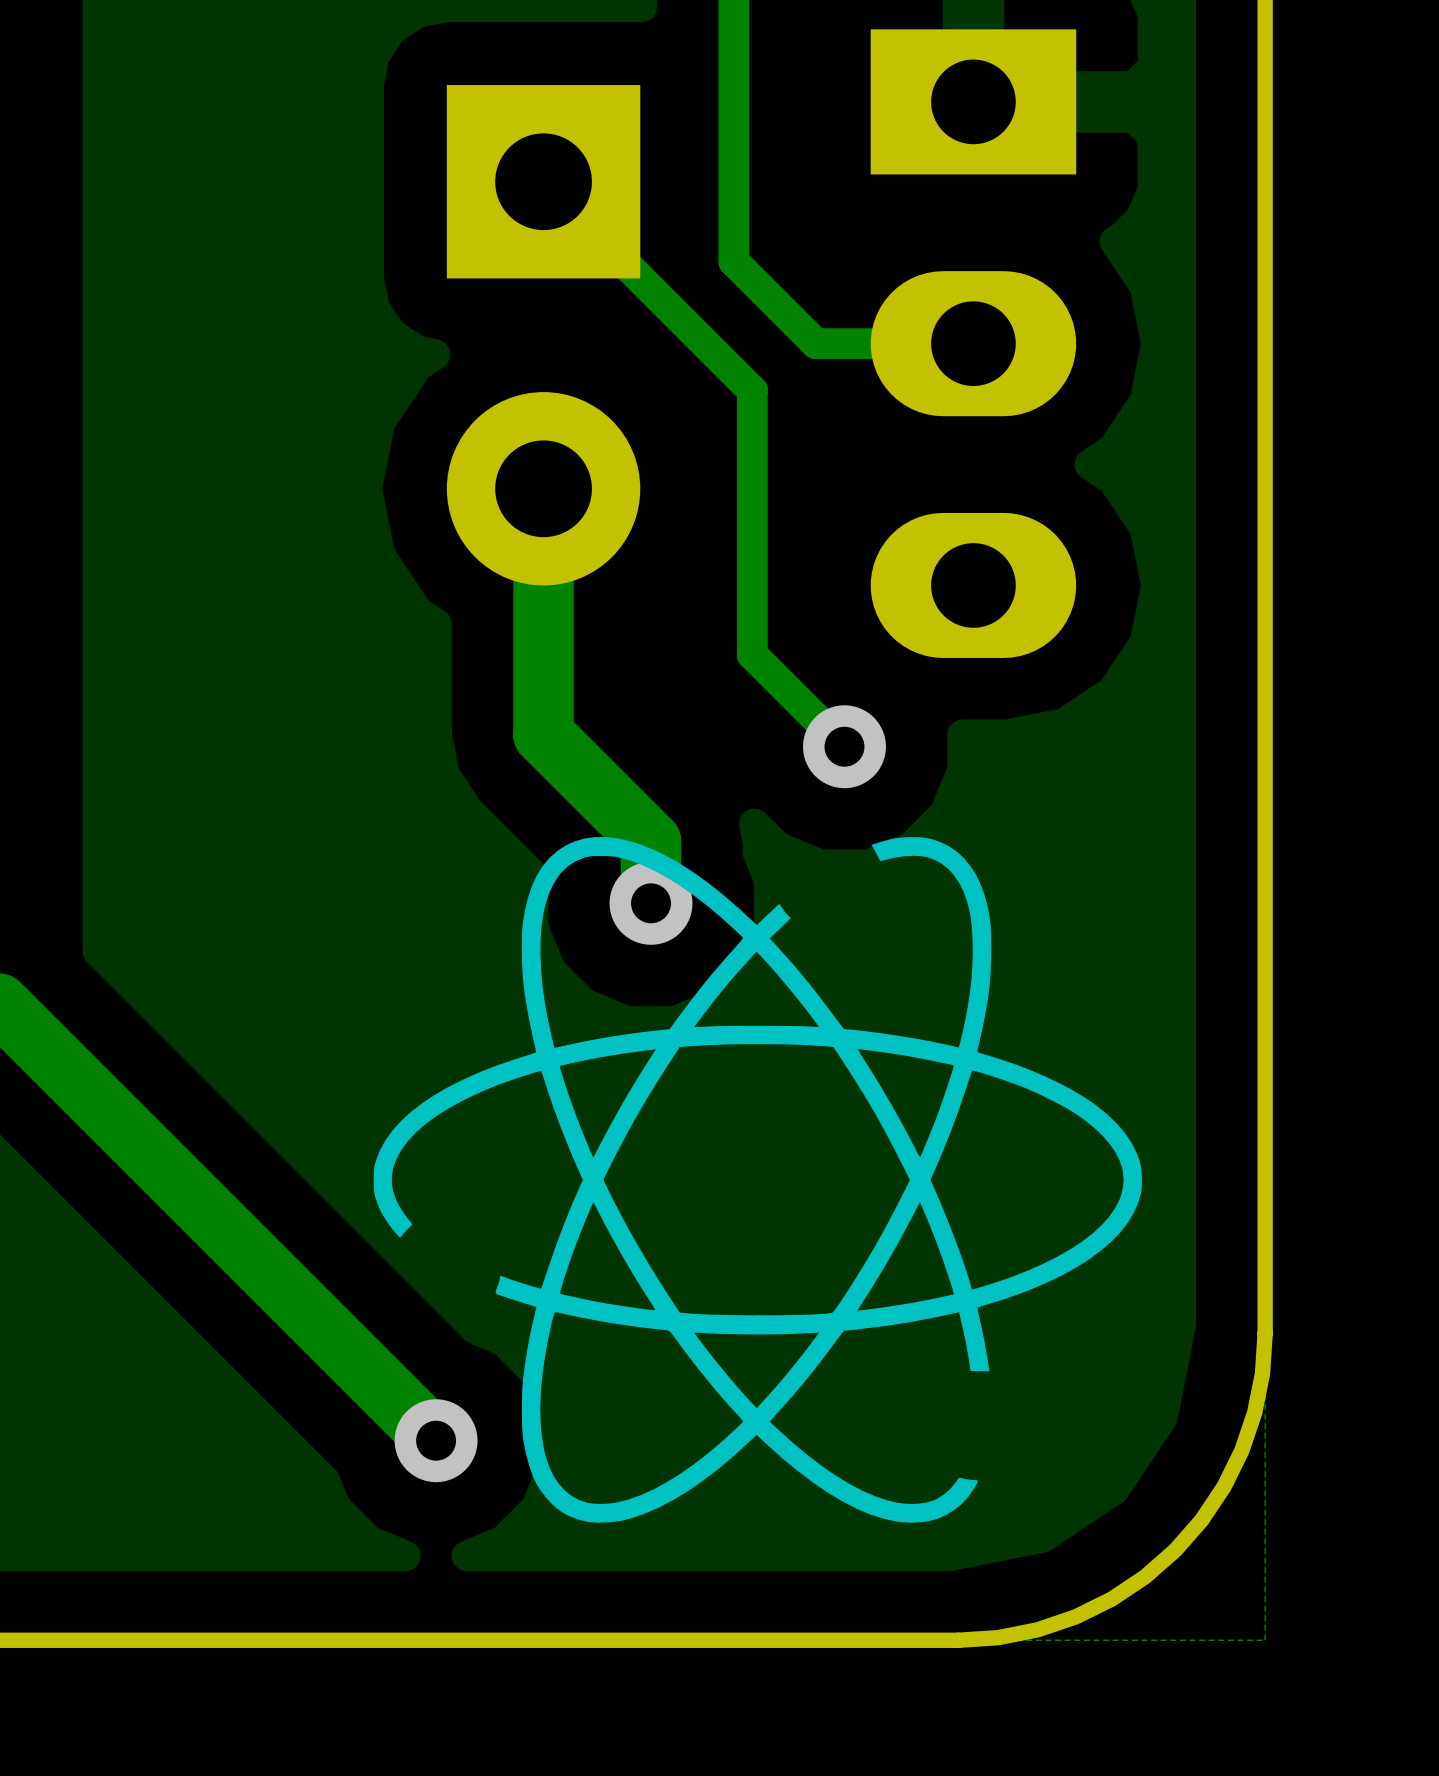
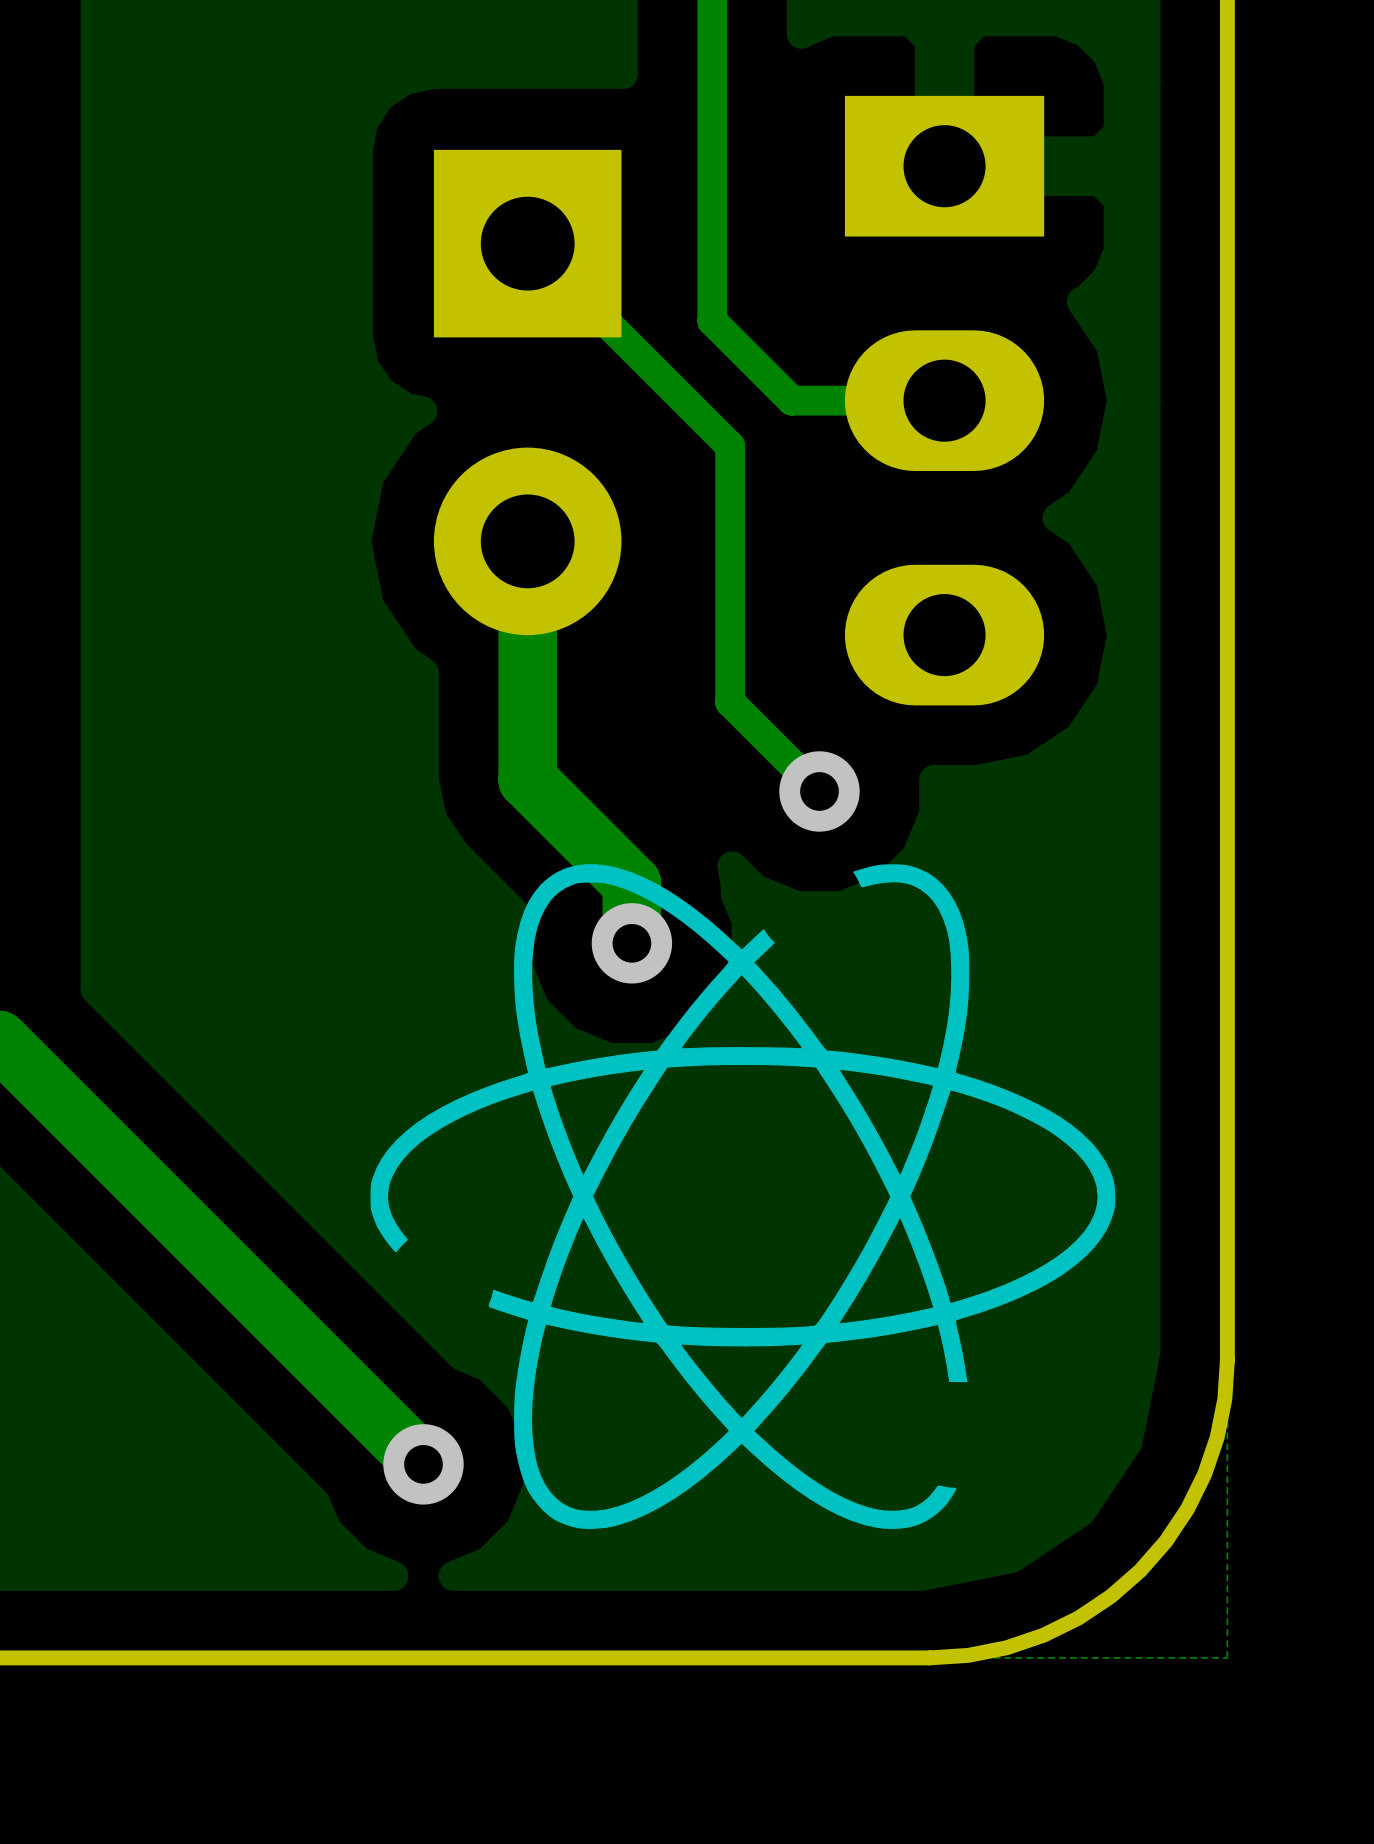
drawing position: (757, 1179) -> (742, 1196)

